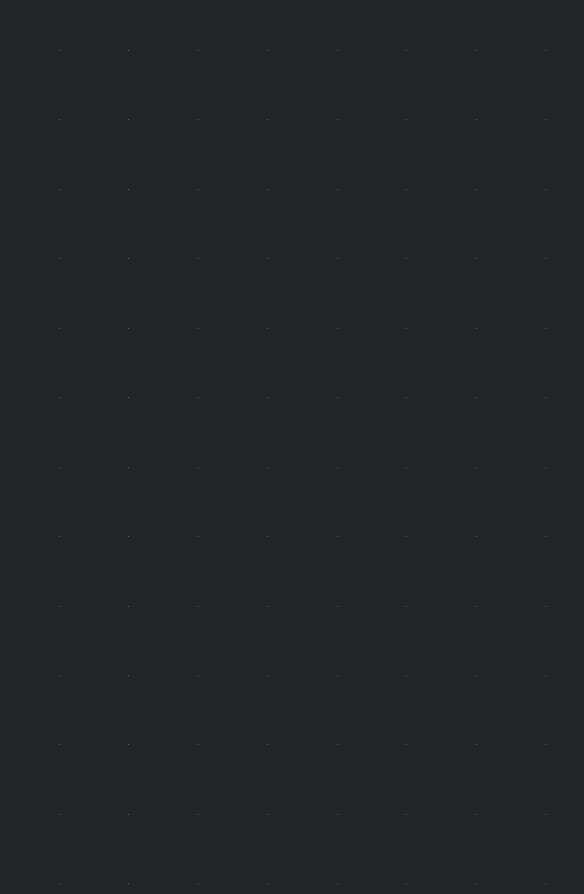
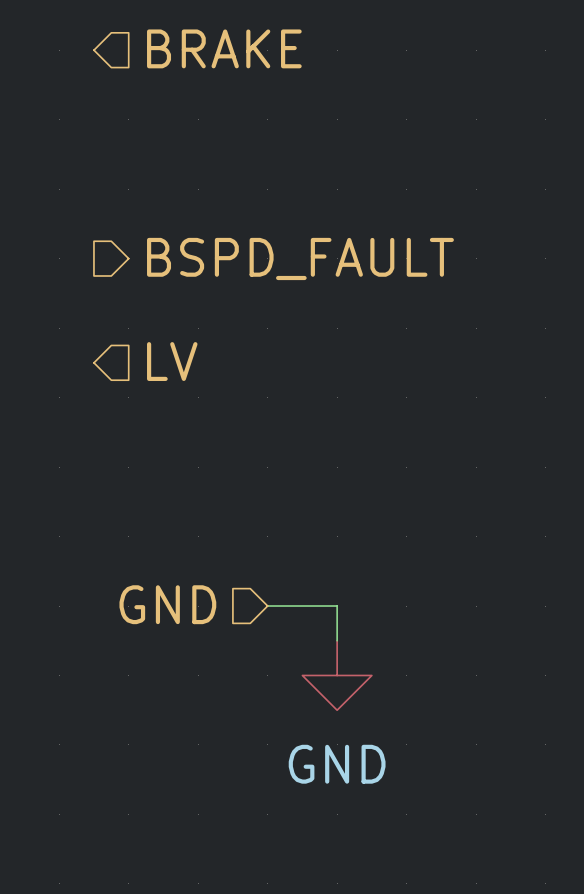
hierarchical label: none -> BRAKE (224, 48)
hierarchical label: none -> BSPD_FAULT (300, 258)
hierarchical label: none -> LV (172, 361)
hierarchical label: none -> GND (167, 604)
wire: none -> (267, 606) (337, 606) (337, 640)
power symbol: none -> GND (337, 675)

